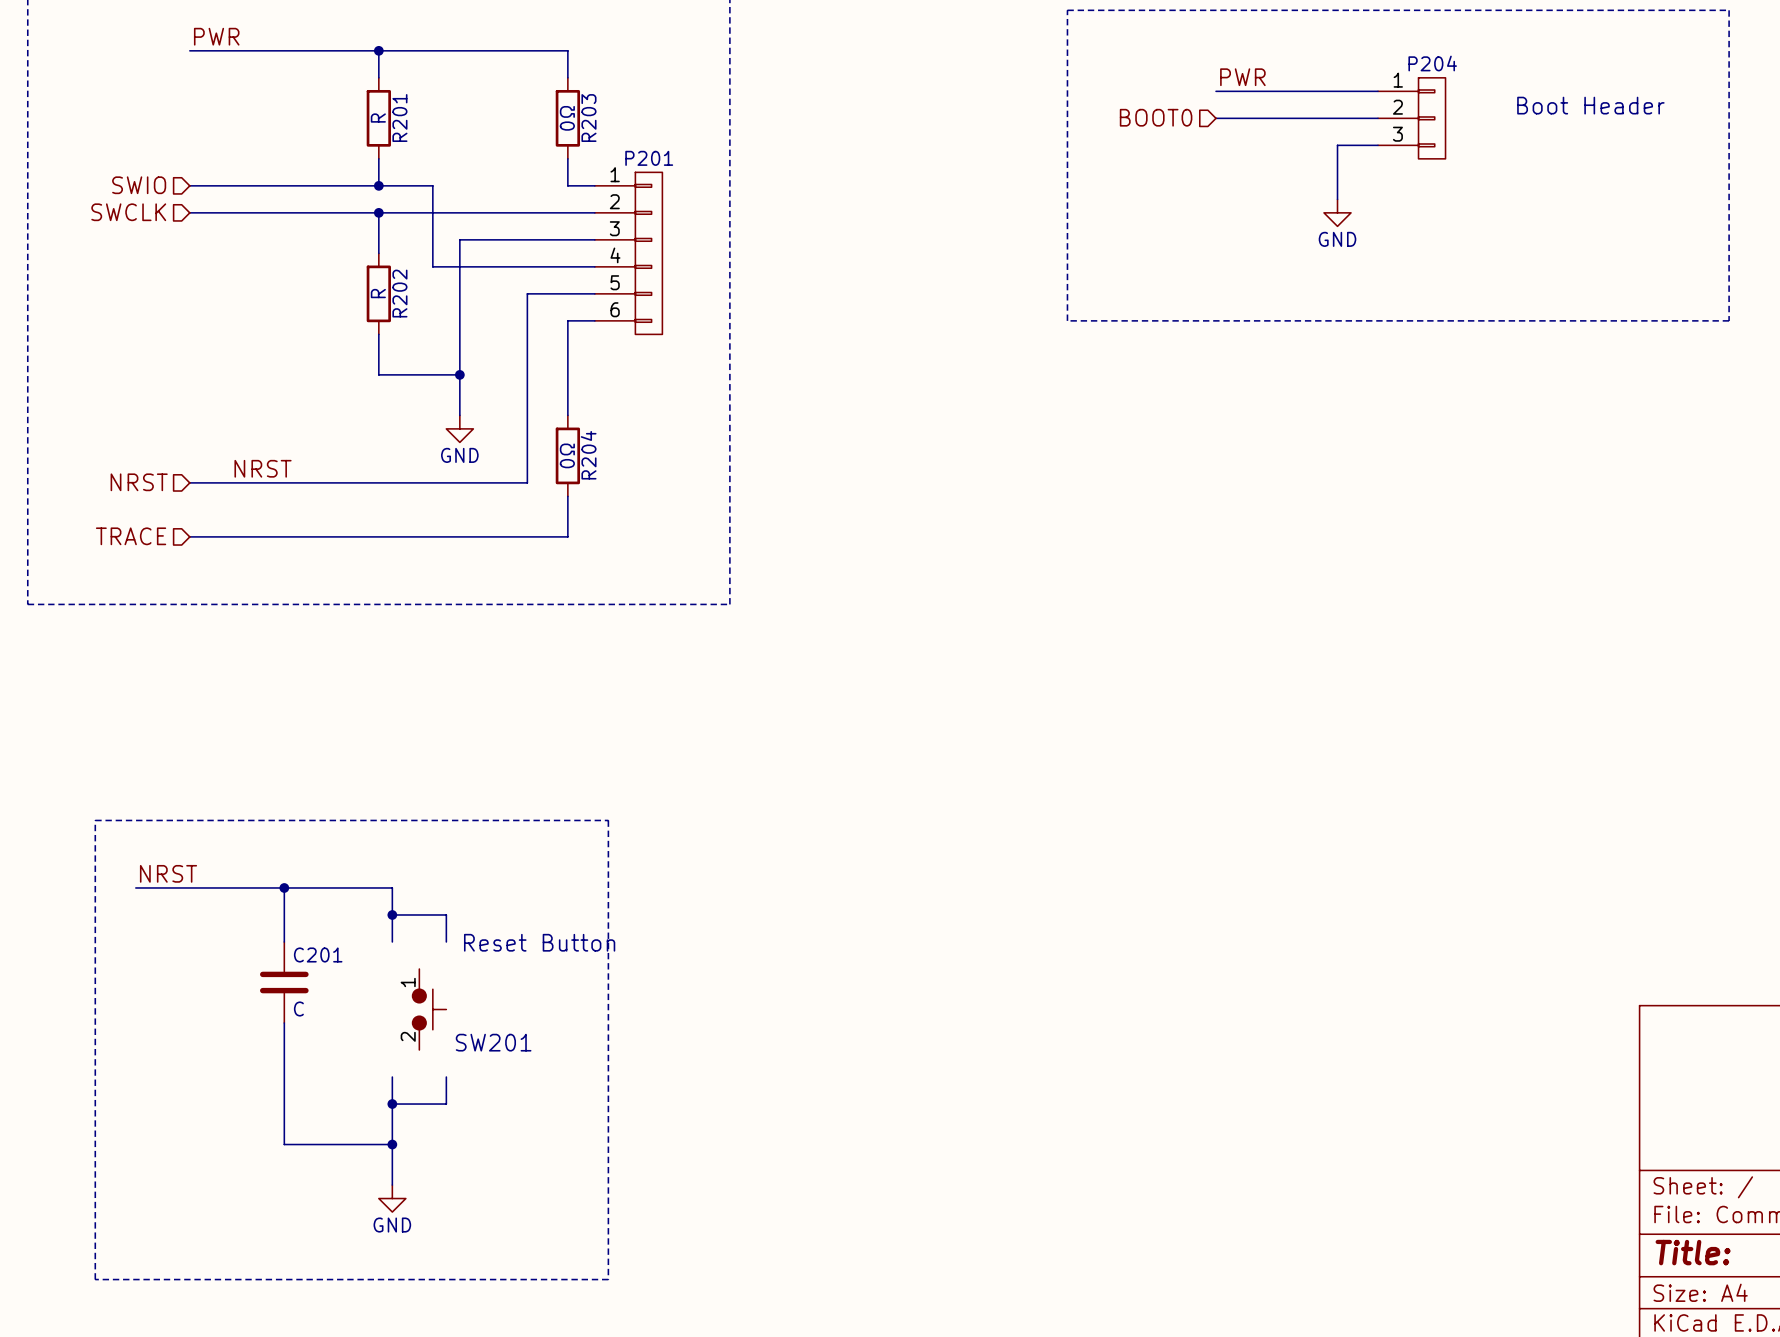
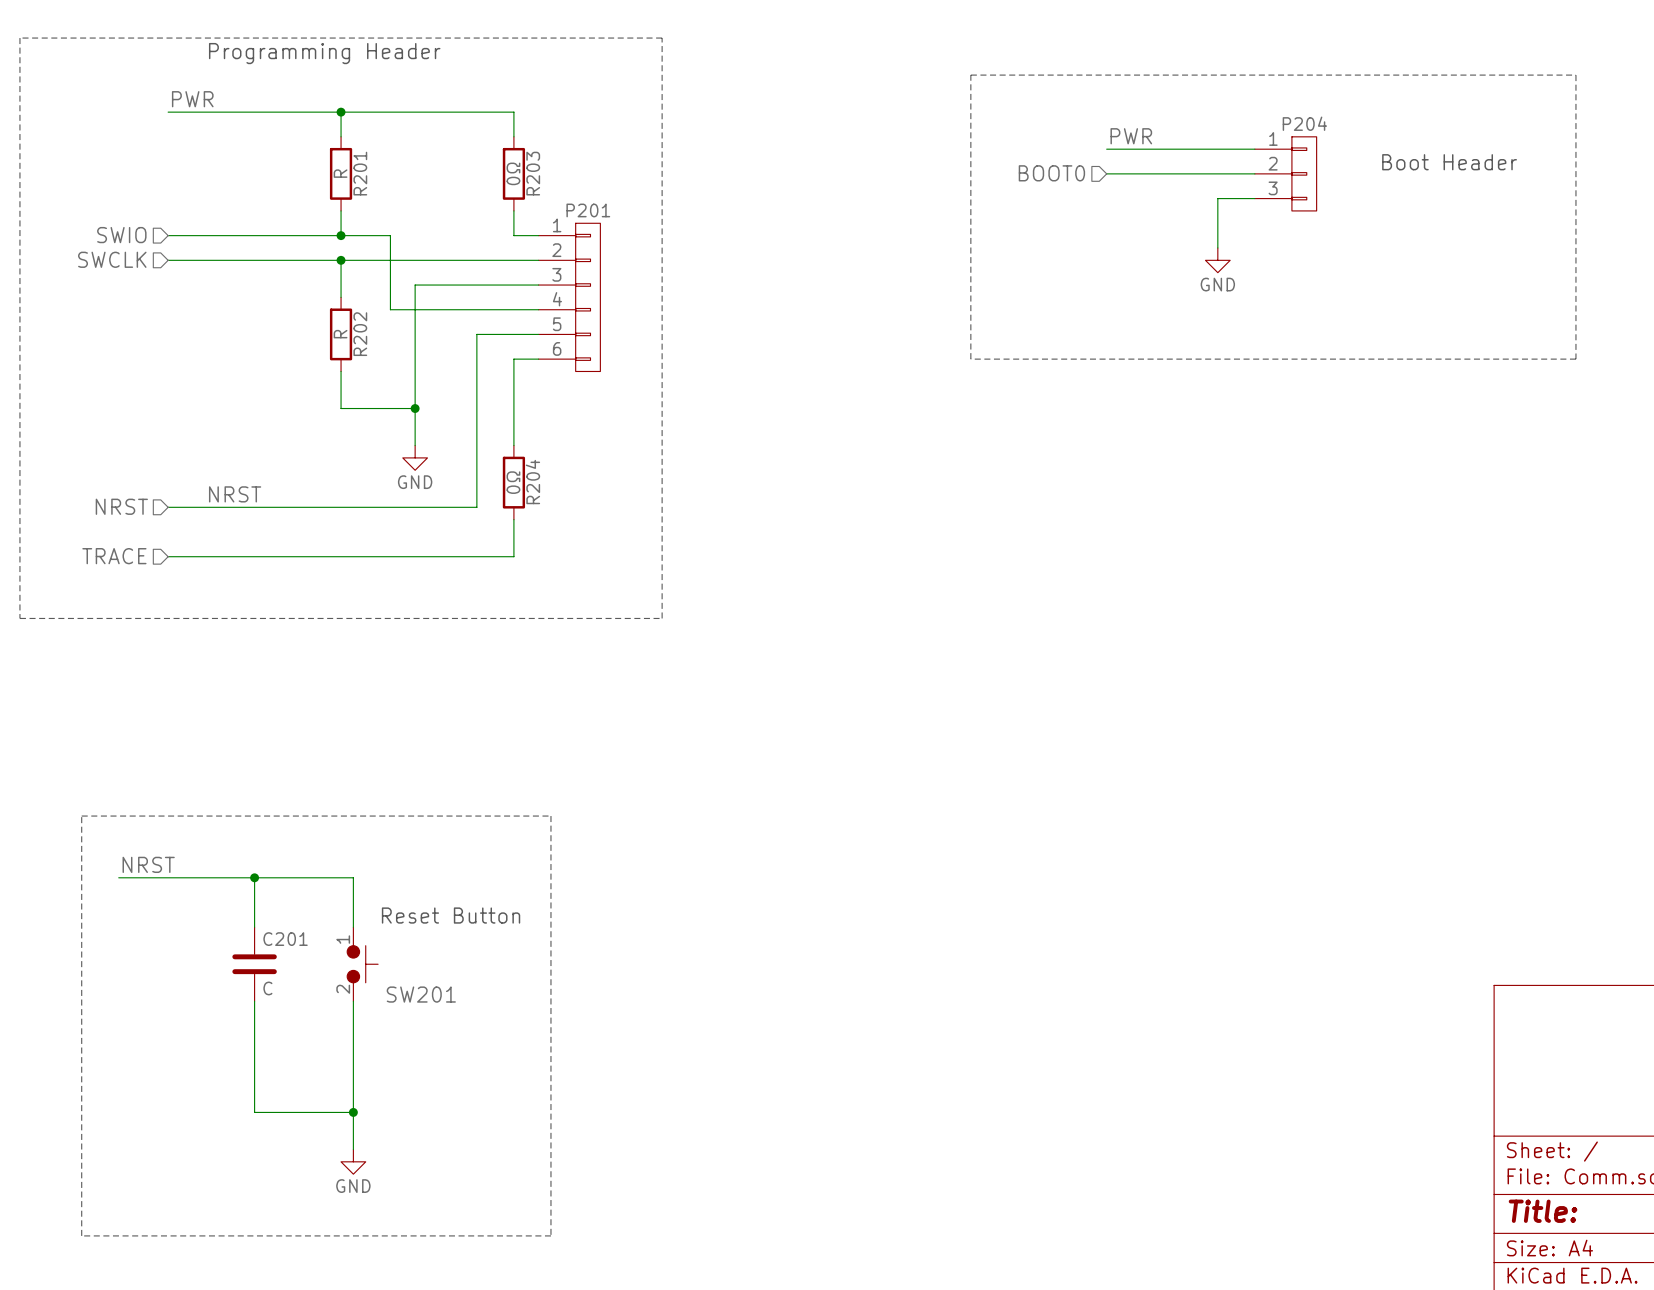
wire: (392, 914) (446, 914) (446, 941) -> none
junction: (392, 914) -> none
text position: Reset Button (539, 942) -> Reset Button (451, 915)
SW201 position: (429, 1009) -> (362, 964)
wire: none -> (353, 1001) (353, 1050)
wire: (446, 1077) (446, 1104) (392, 1104) -> none
junction: (392, 1104) -> none

